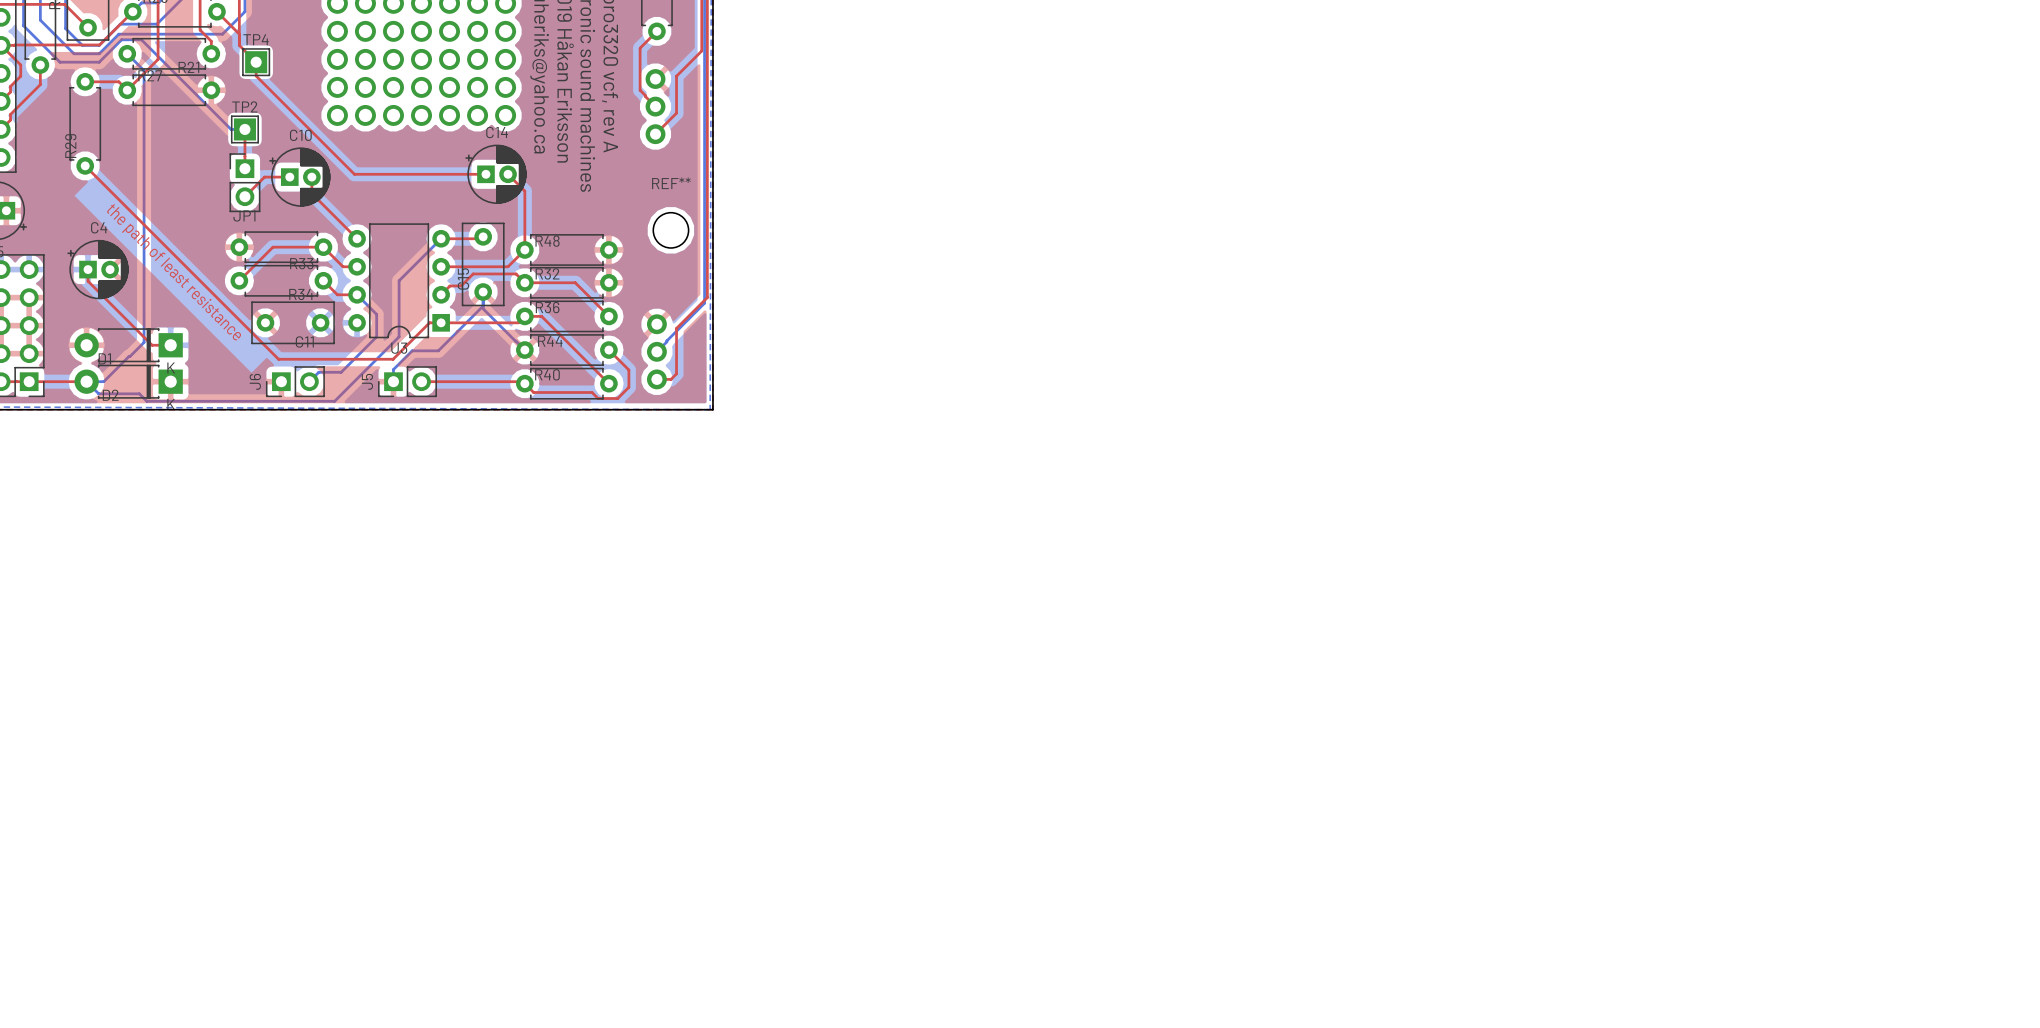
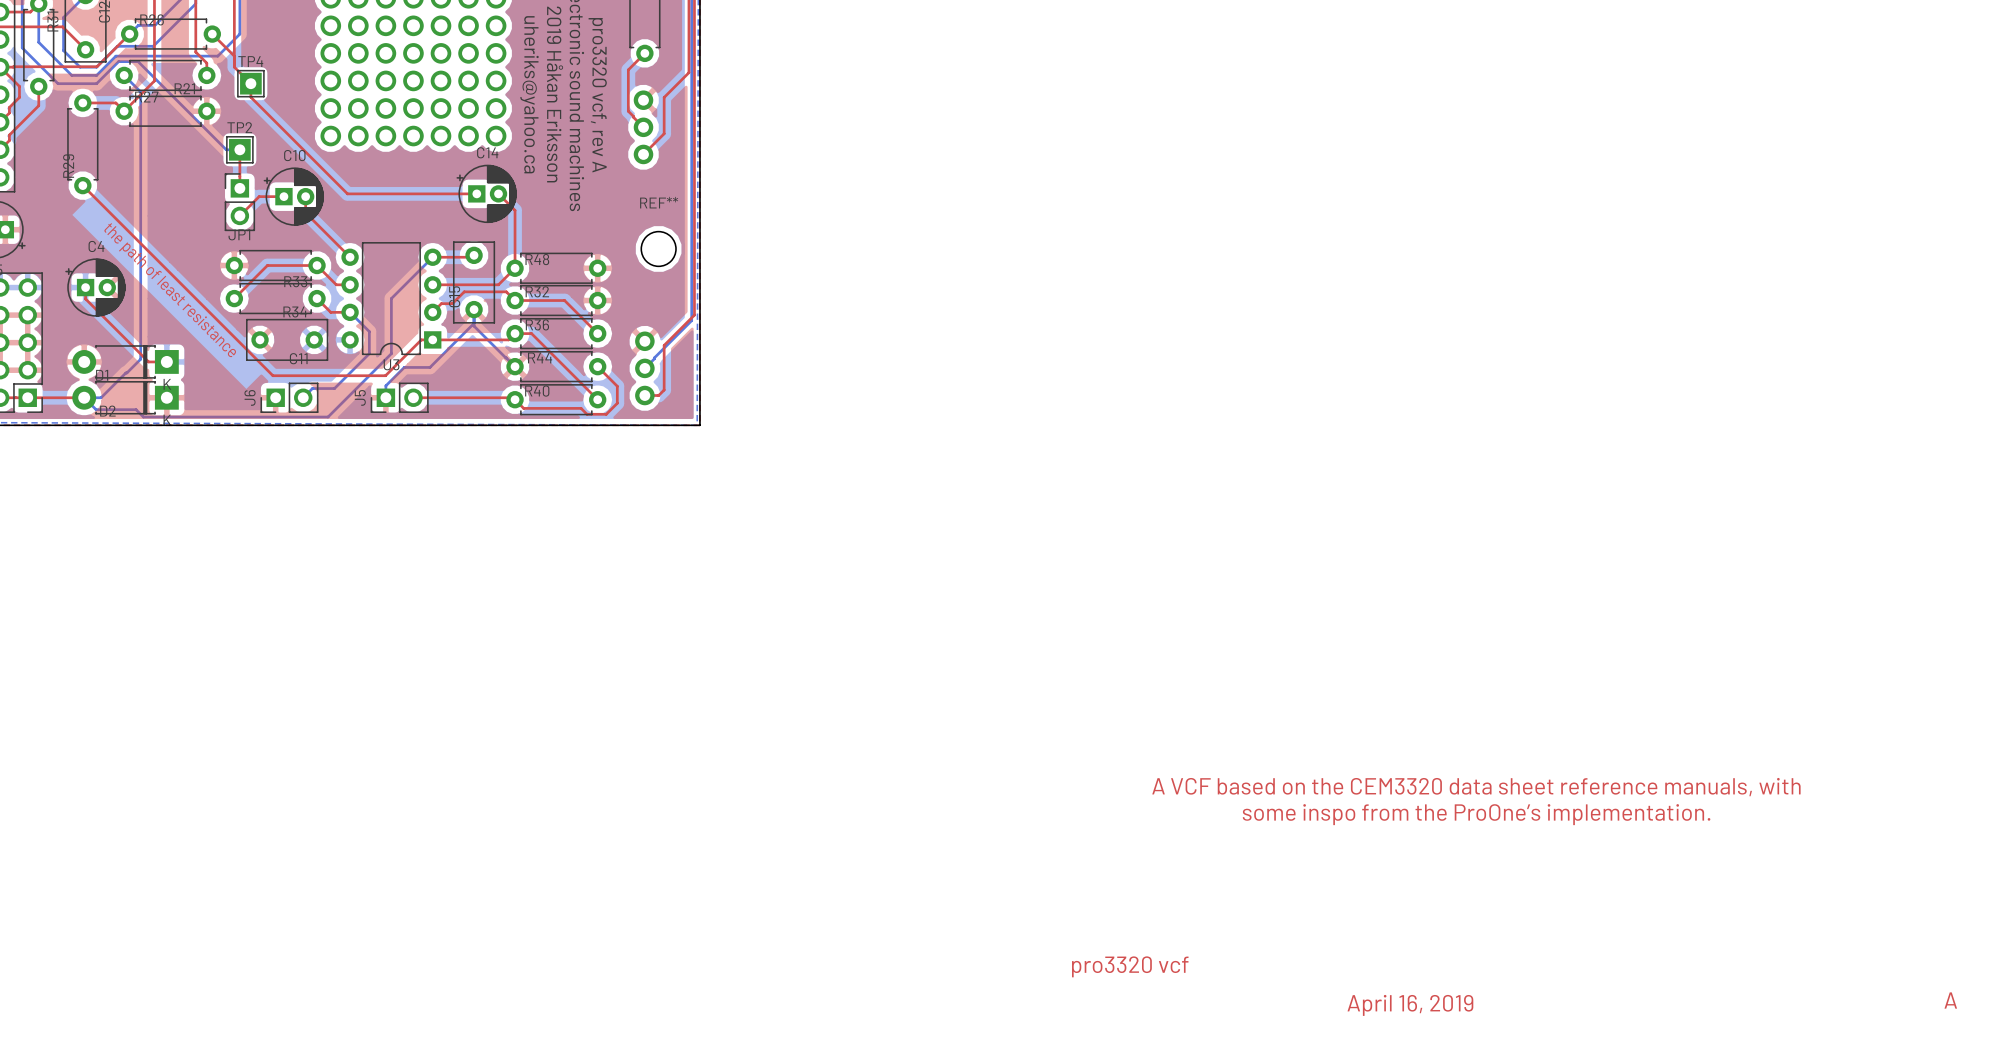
text: none -> A VCF based on the CEM3320 data sheet reference manuals, with (1476, 787)
text: none -> some inspo from the ProOne’s implementation. (1476, 814)
text: none -> pro3320 vcf (1130, 966)
text: none -> A (1950, 1000)
text: none -> April 16, 2019 (1410, 1005)

